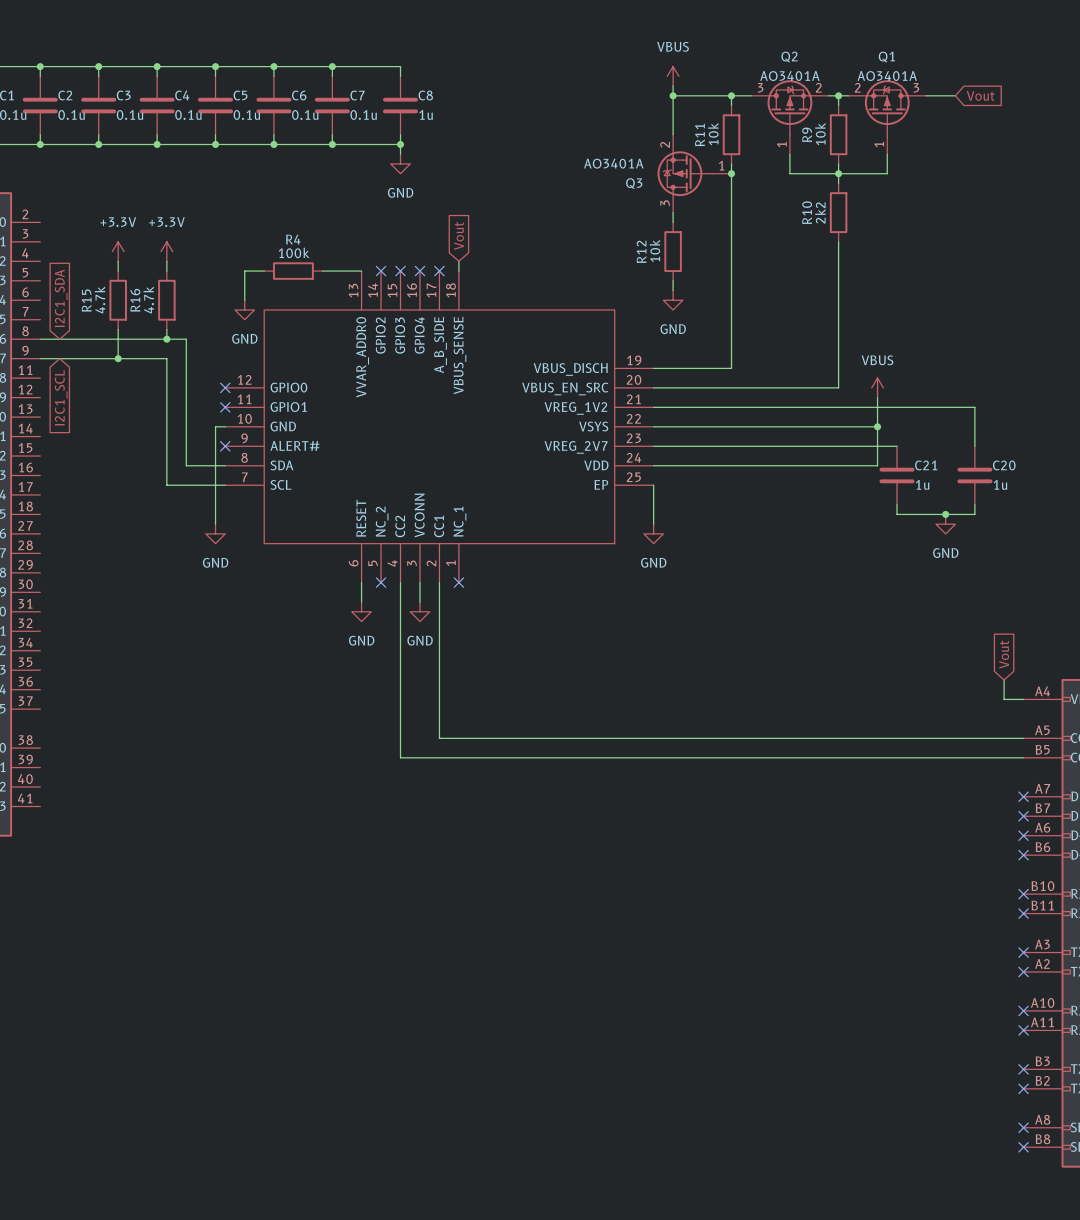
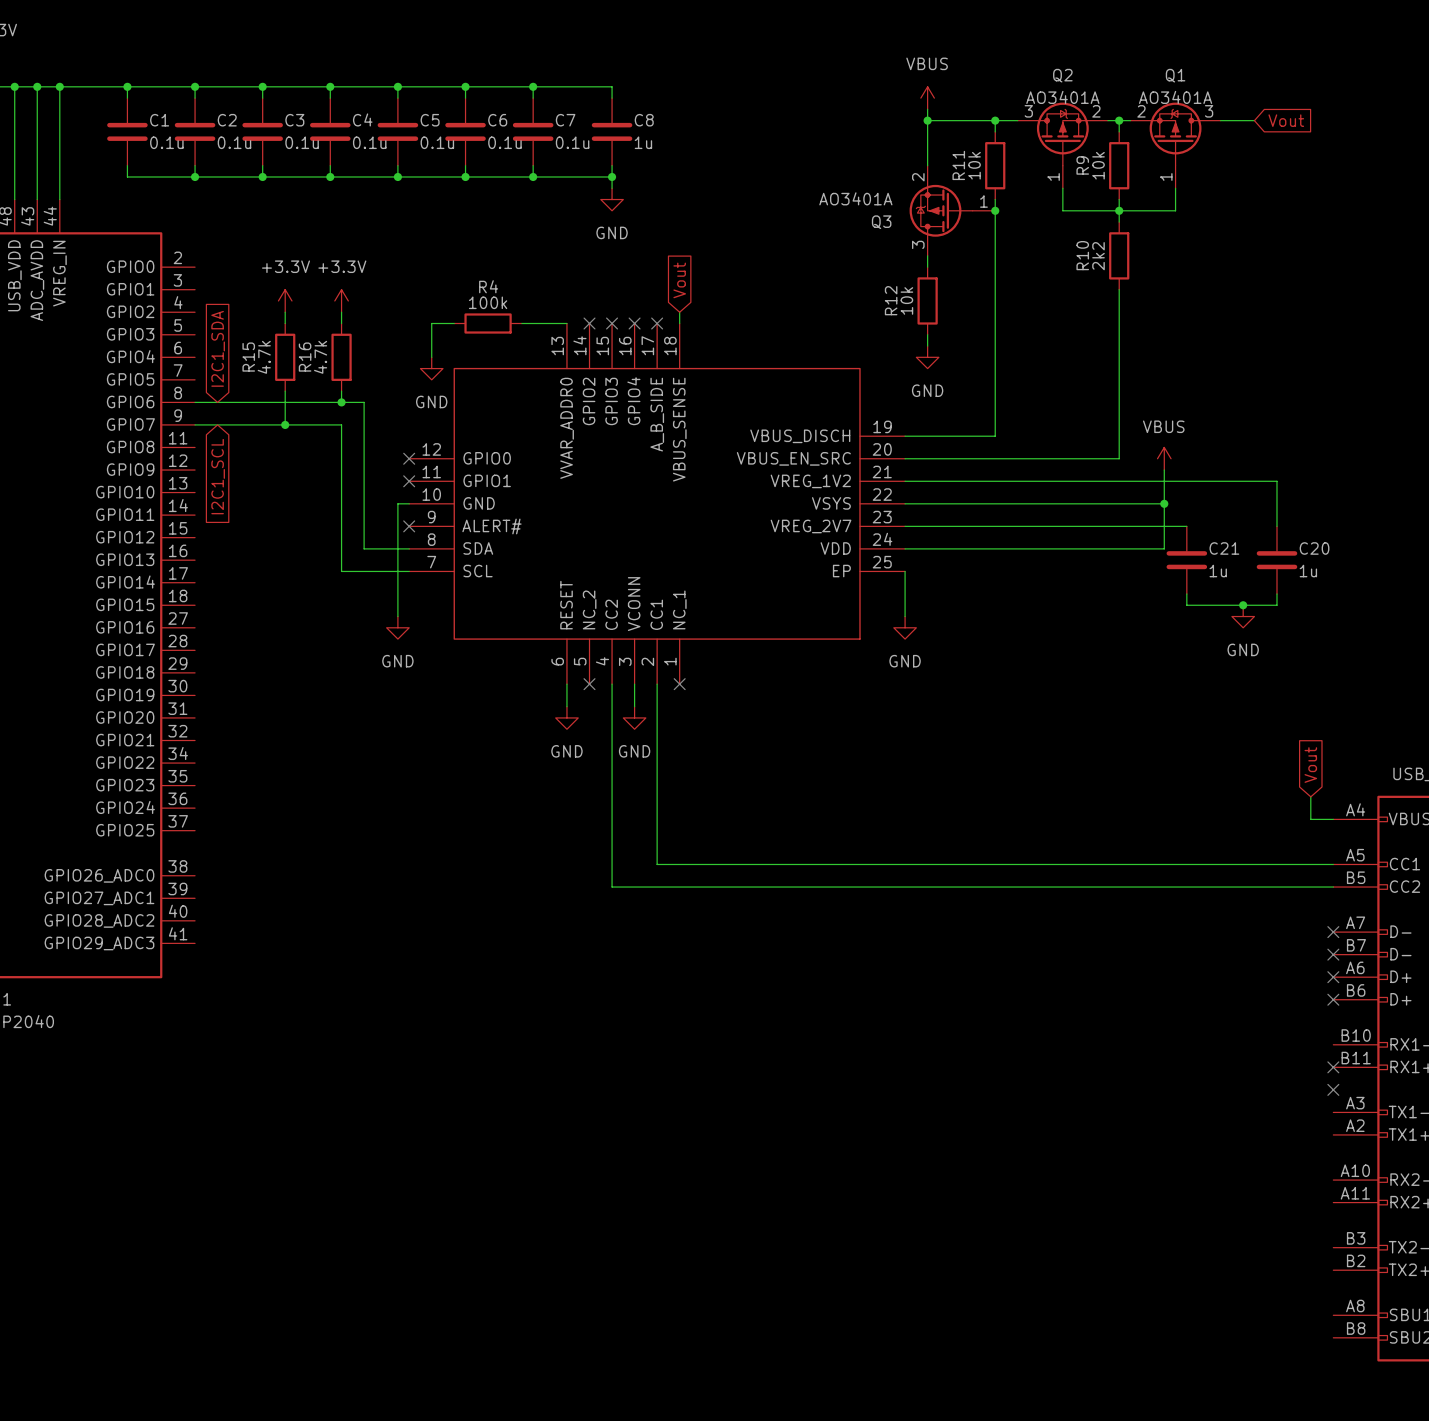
no-connect mark: (1023, 894) -> none
no-connect mark: none -> (1333, 1089)
no-connect mark: (1023, 952) -> none
no-connect mark: (1023, 971) -> none
no-connect mark: (1023, 1010) -> none
no-connect mark: (1023, 1030) -> none
no-connect mark: (1023, 1069) -> none
no-connect mark: (1023, 1088) -> none
no-connect mark: (1023, 1127) -> none
no-connect mark: (1023, 1147) -> none

